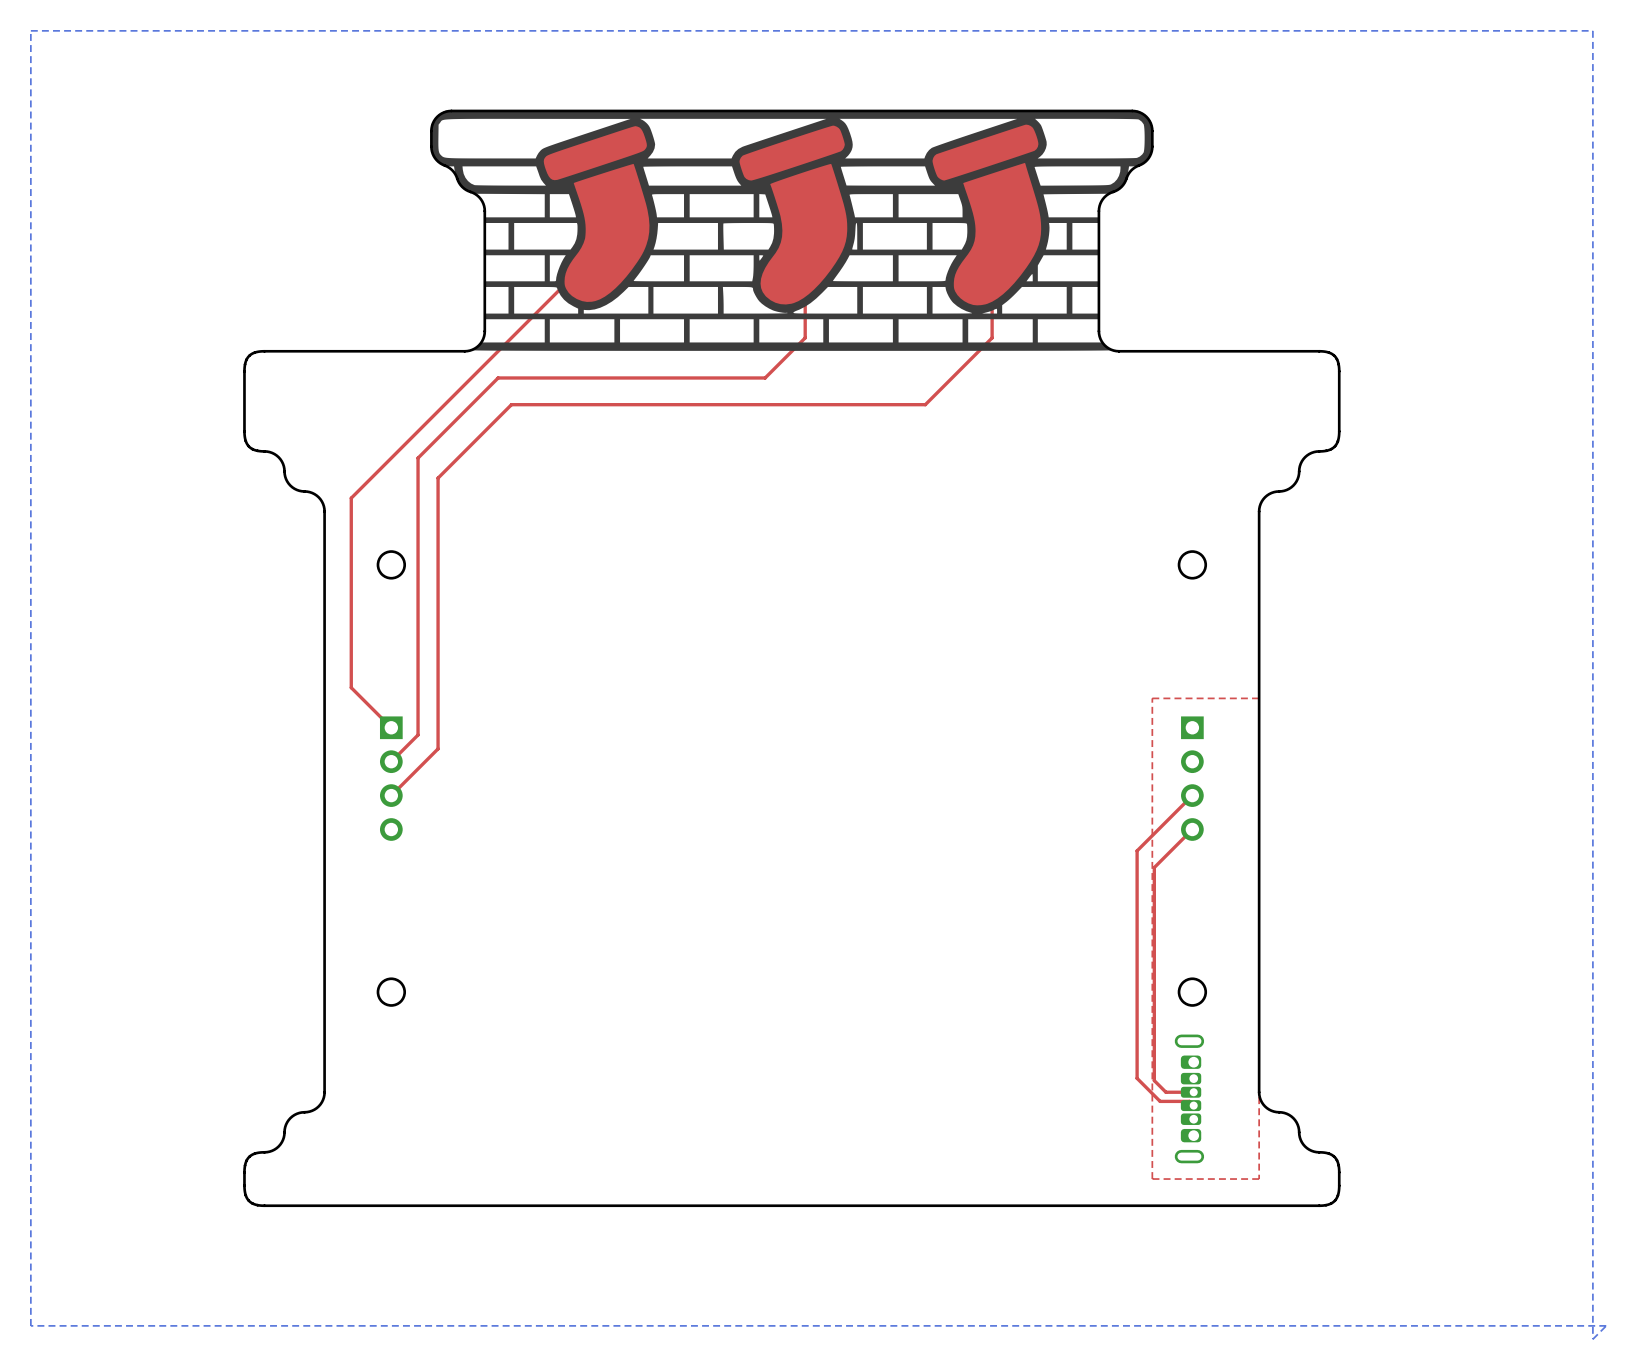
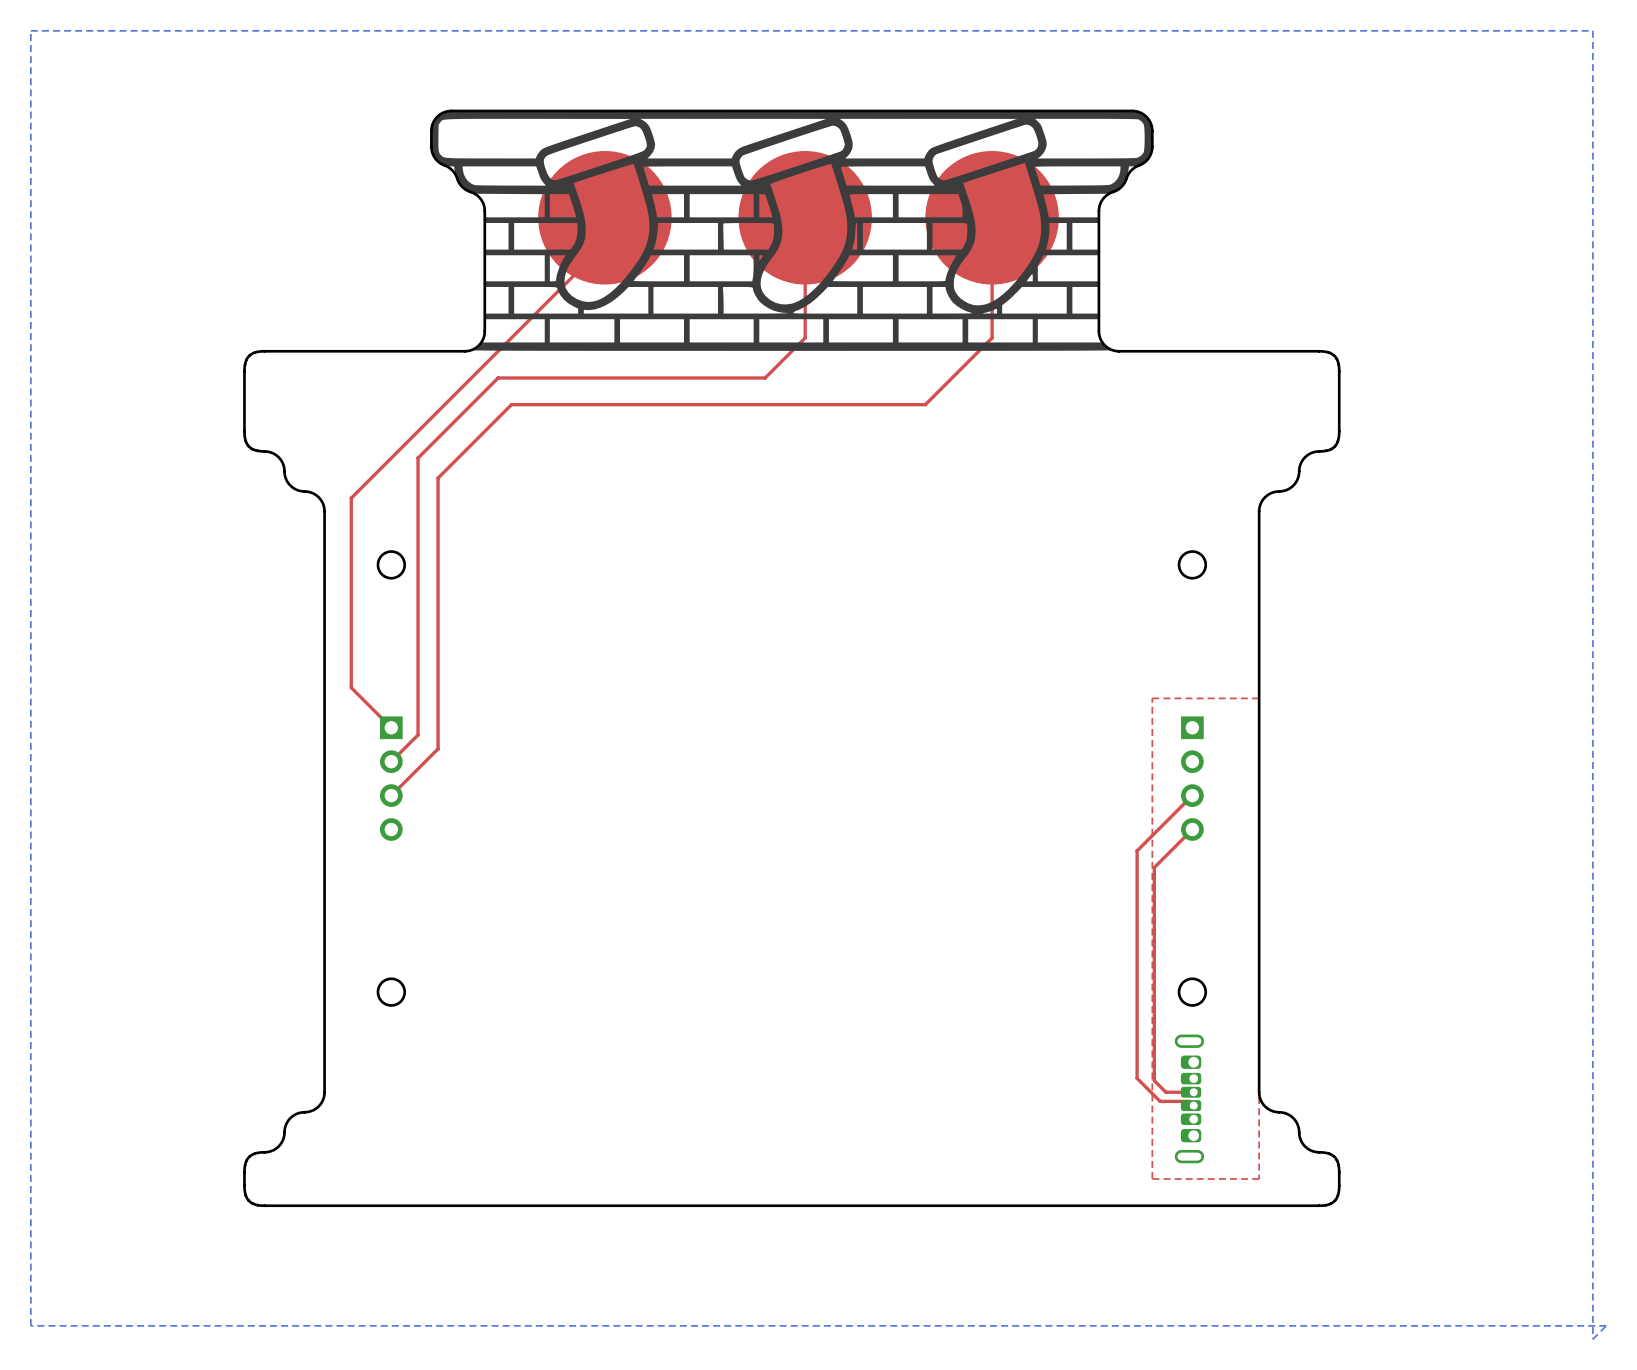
part footprint: [539, 121, 656, 307] -> [538, 151, 672, 285]
part footprint: [736, 122, 852, 309] -> [738, 151, 872, 285]
part footprint: [928, 122, 1045, 308] -> [925, 151, 1059, 285]

